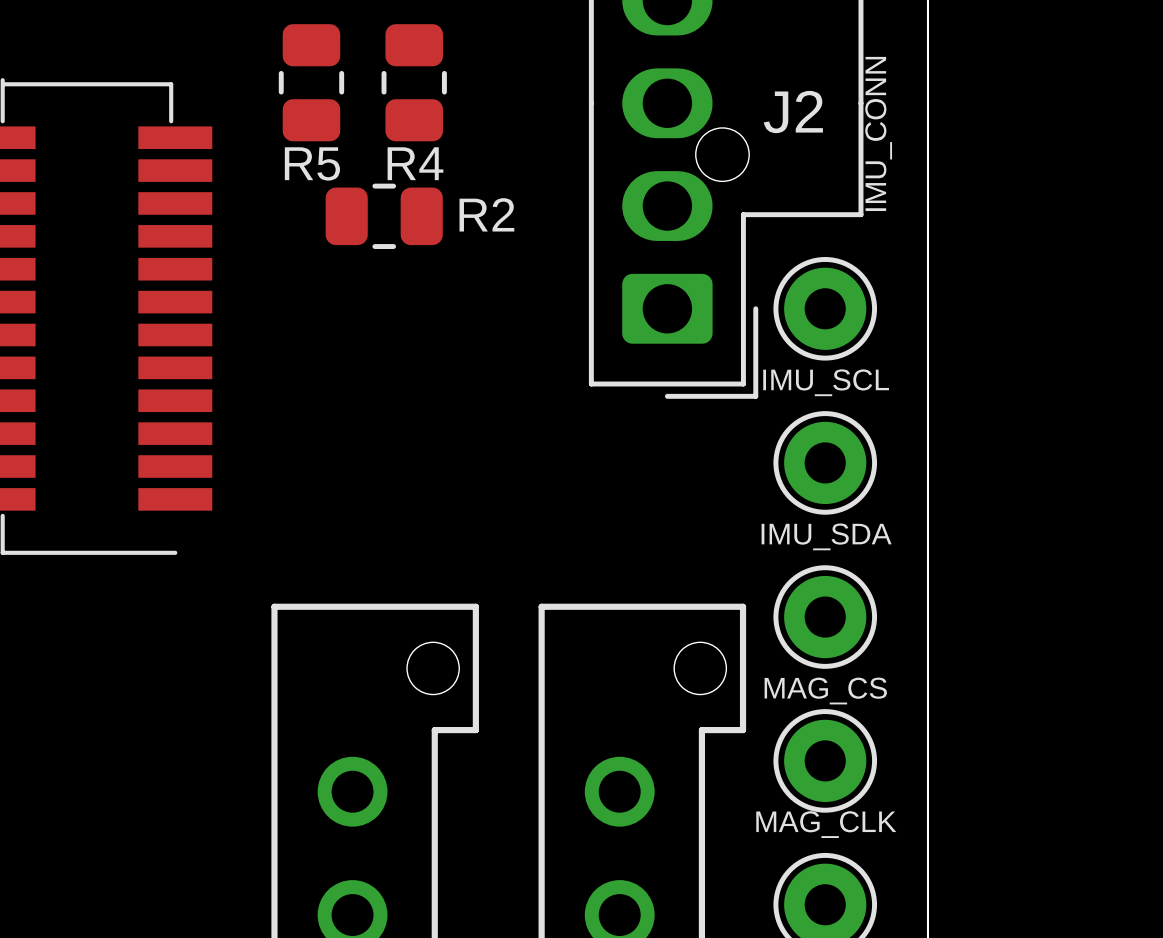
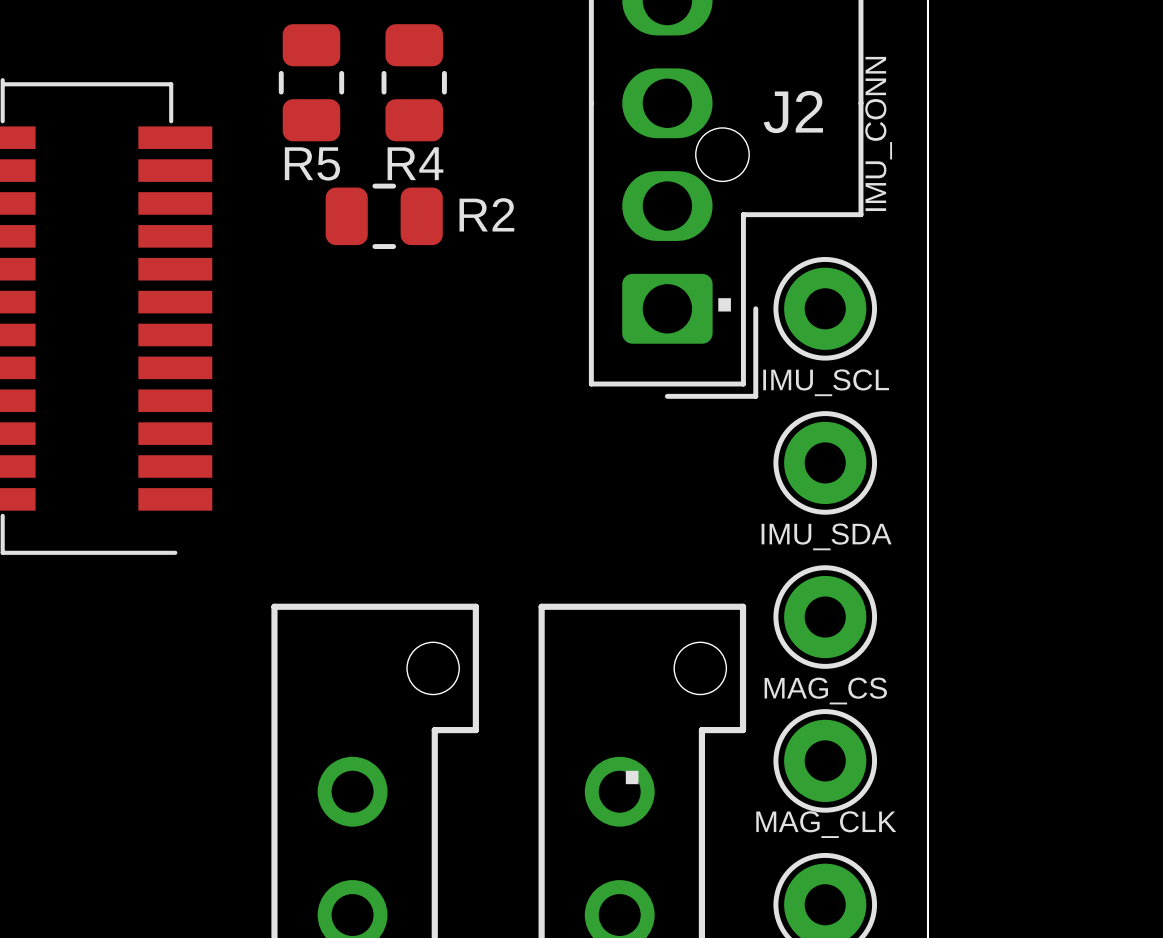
text: none -> . (724, 304)
text: none -> . (632, 777)

